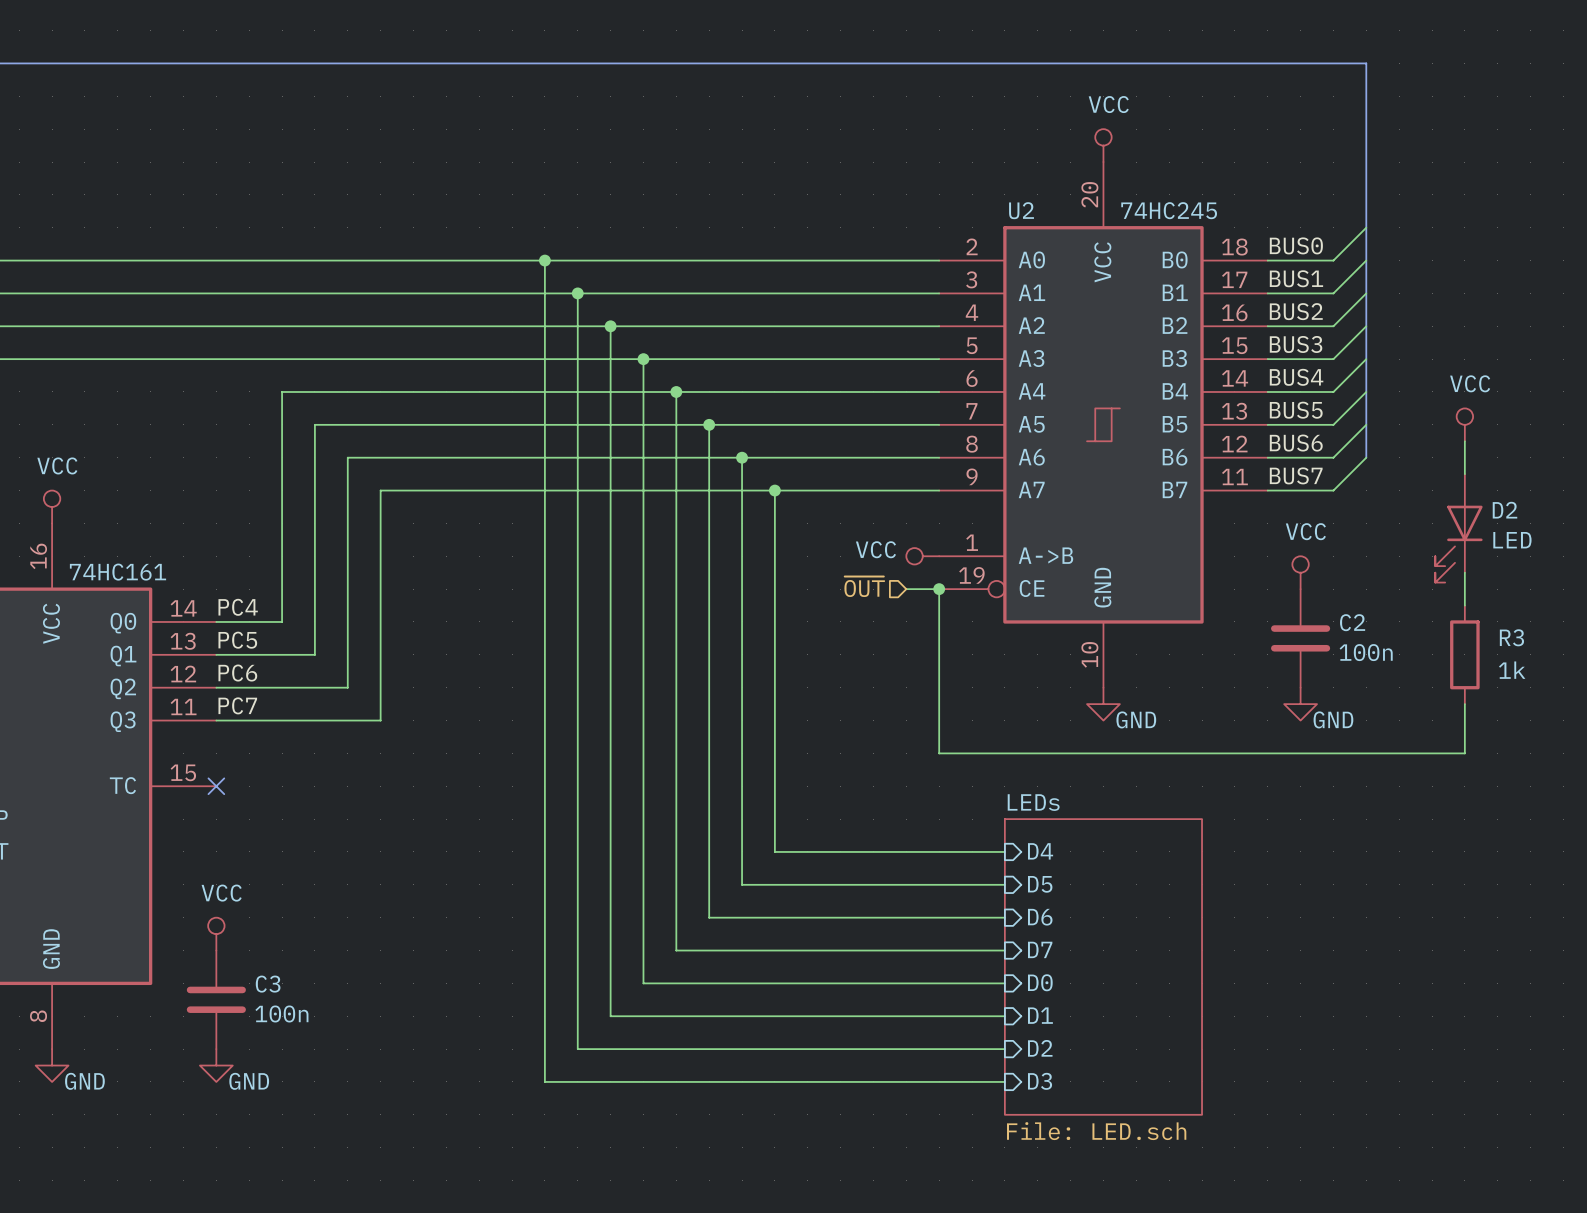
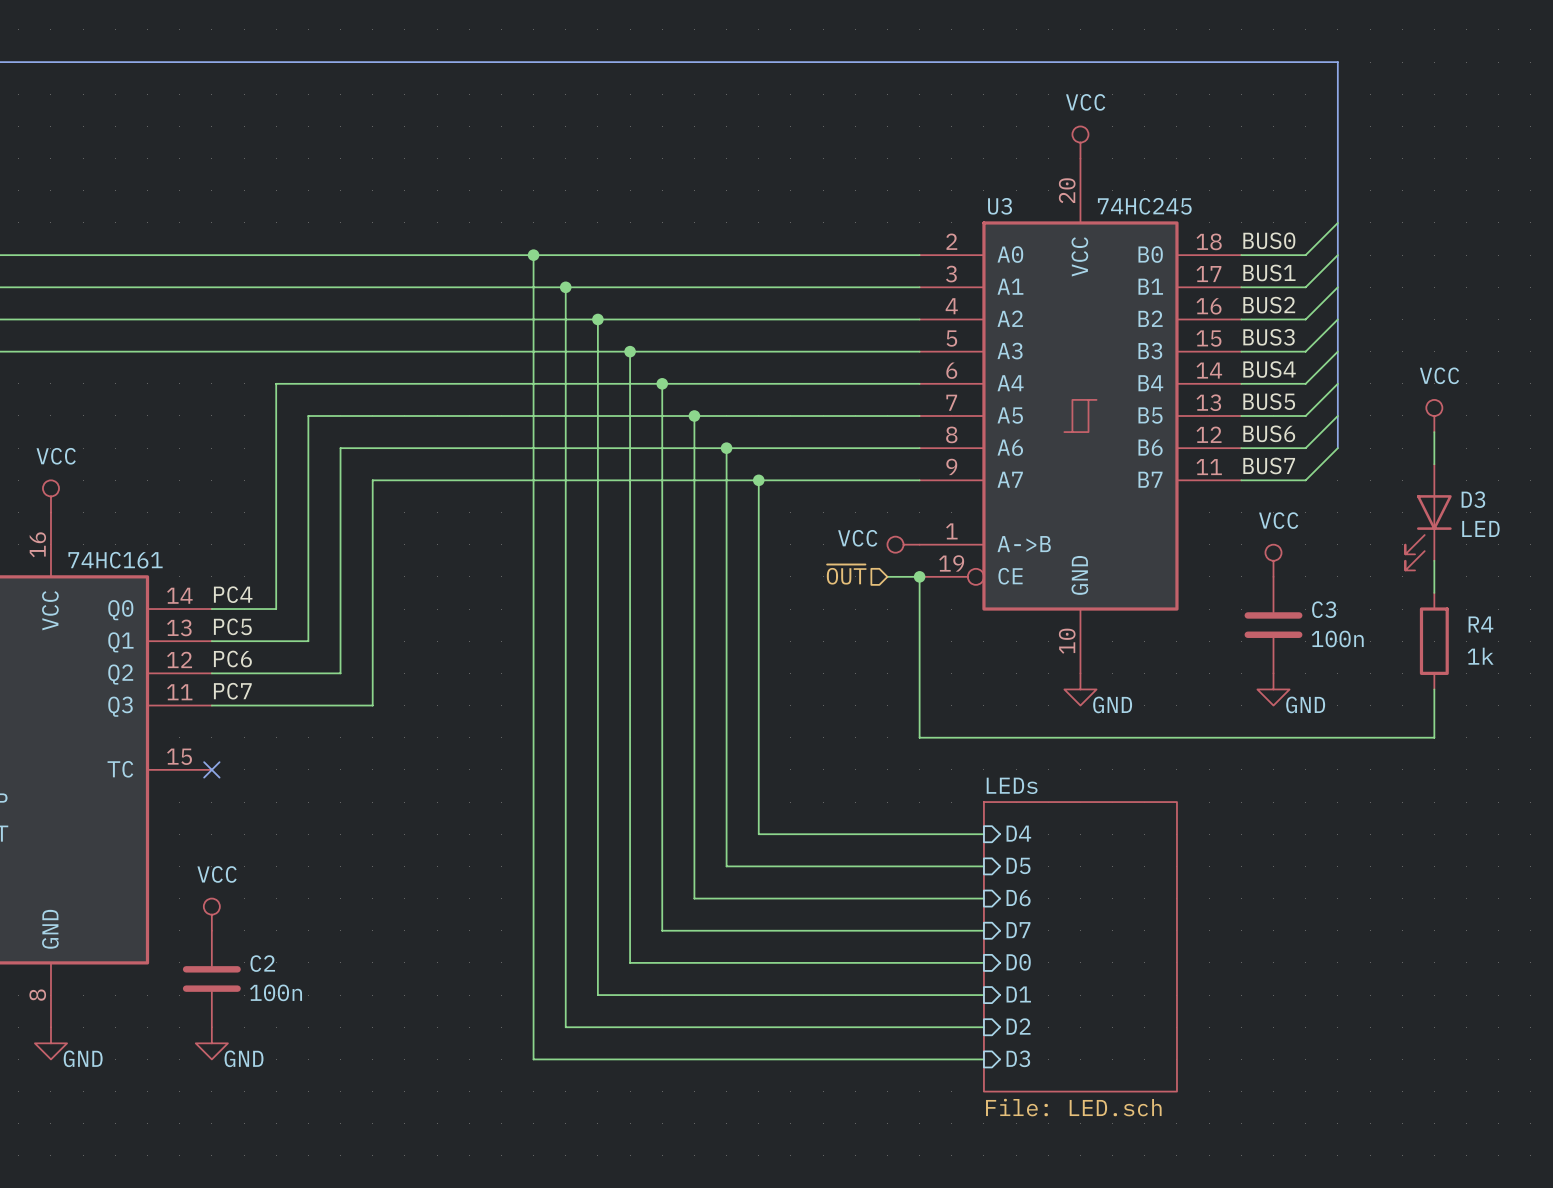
U2 name: U2 (1021, 210) -> U3 (1000, 206)
D2 name: D2 (1504, 510) -> D3 (1473, 499)
C2 name: C2 (1352, 622) -> C3 (1324, 609)
R3 name: R3 (1511, 637) -> R4 (1480, 624)
C3 name: C3 (268, 984) -> C2 (262, 963)

